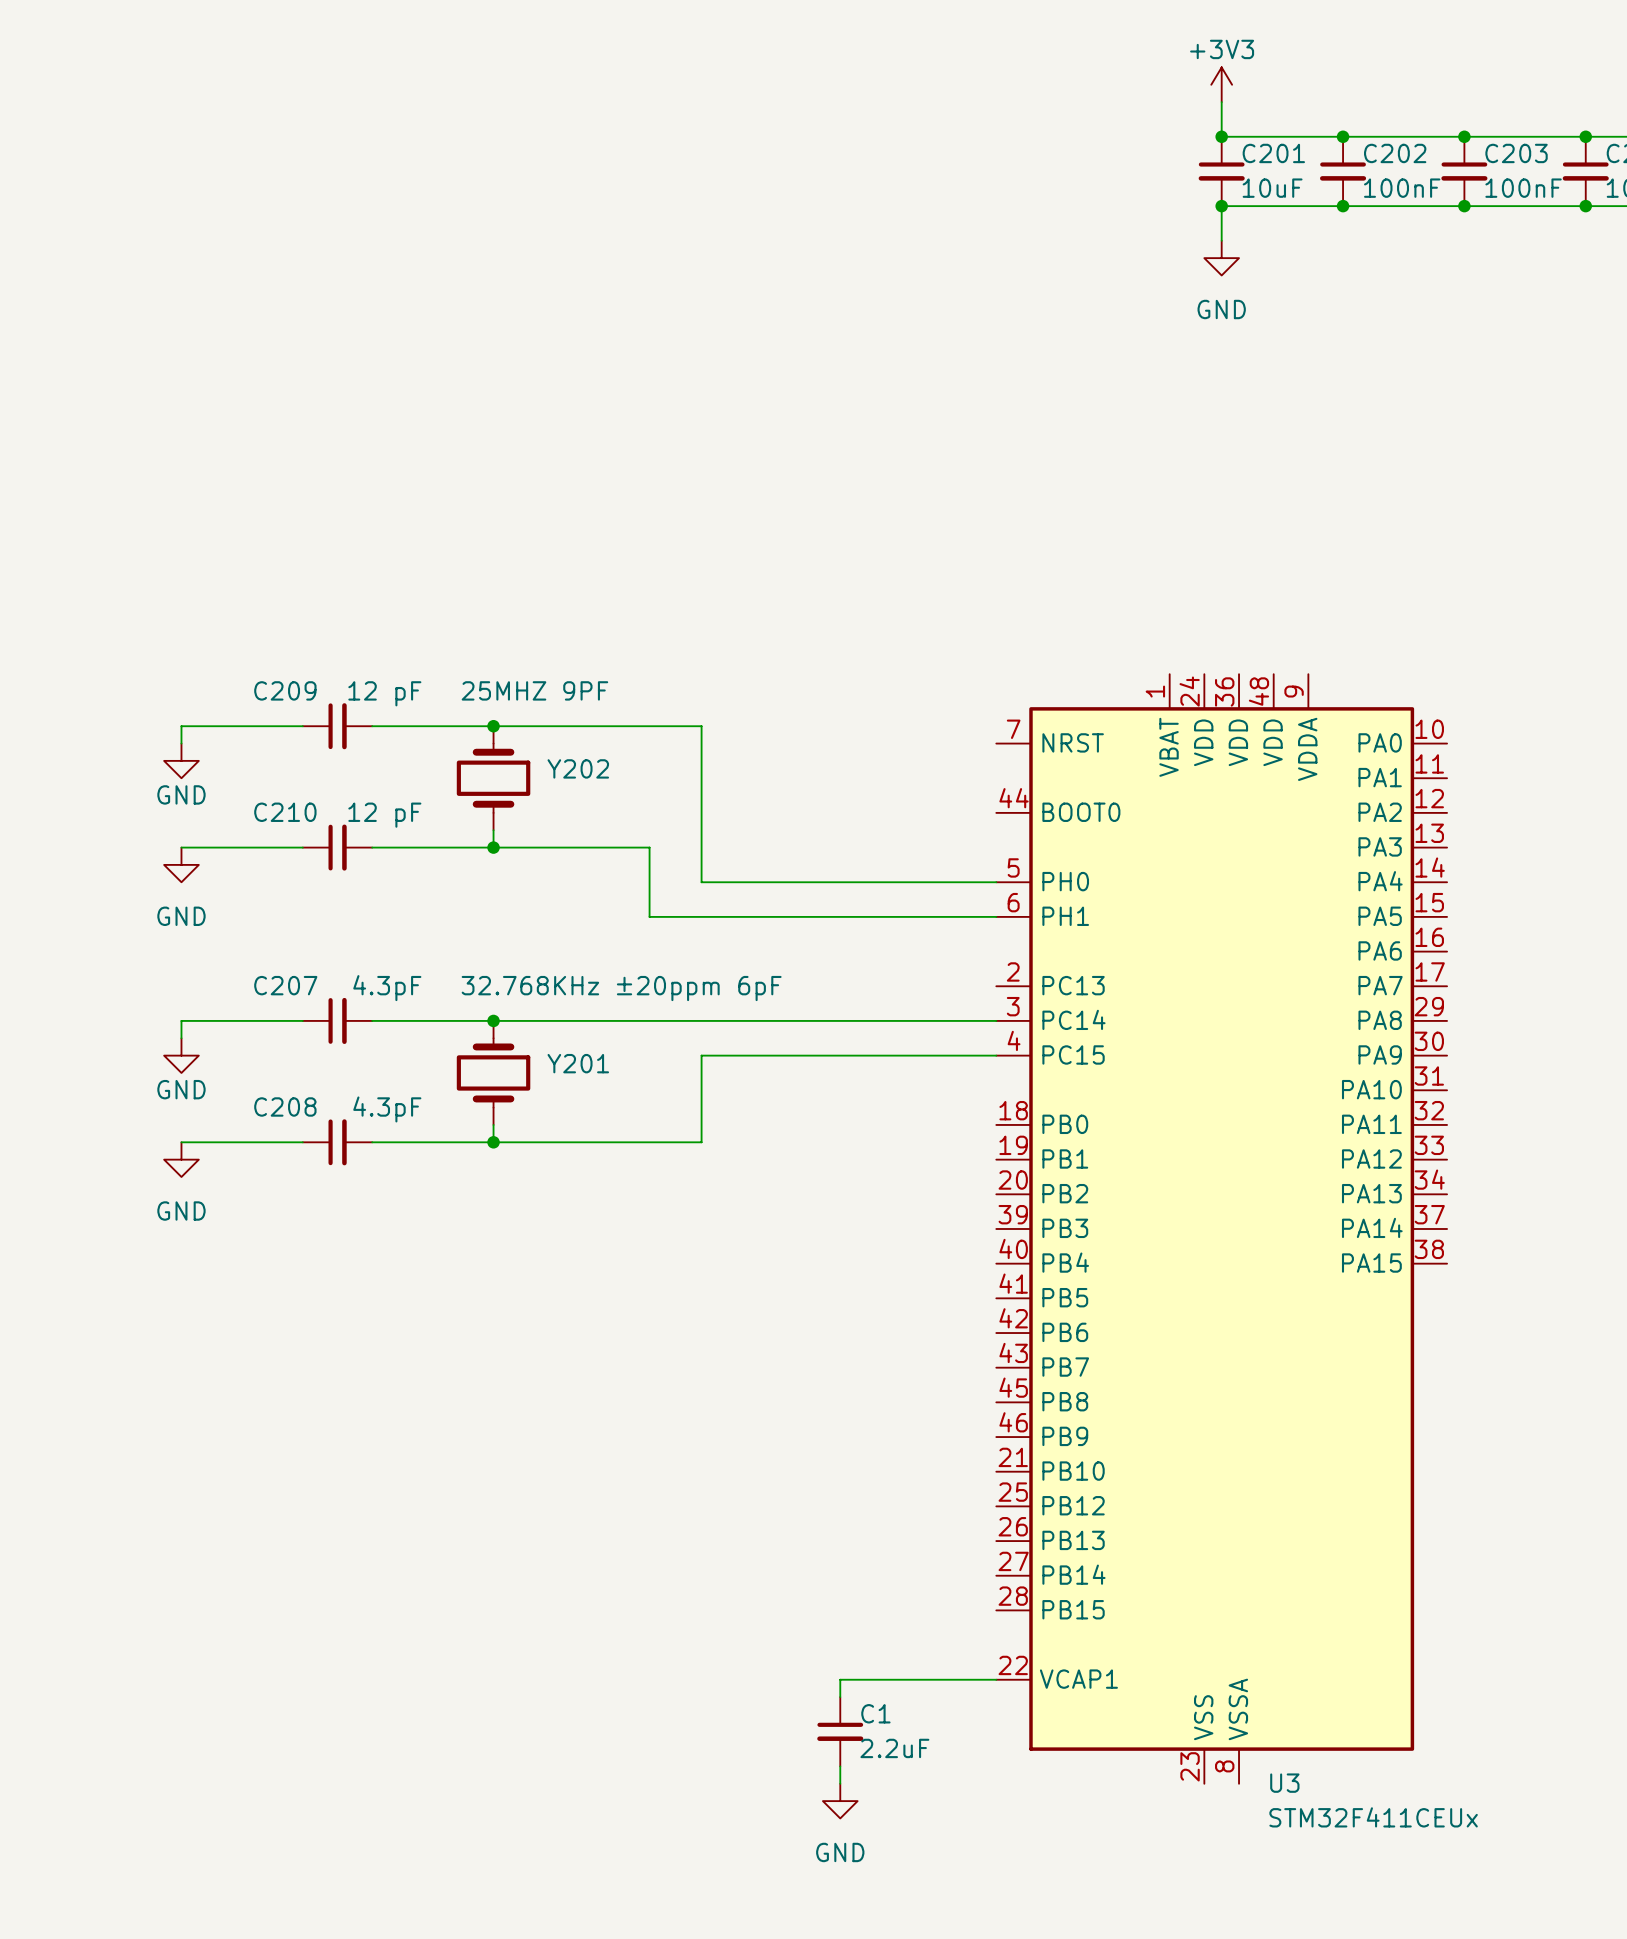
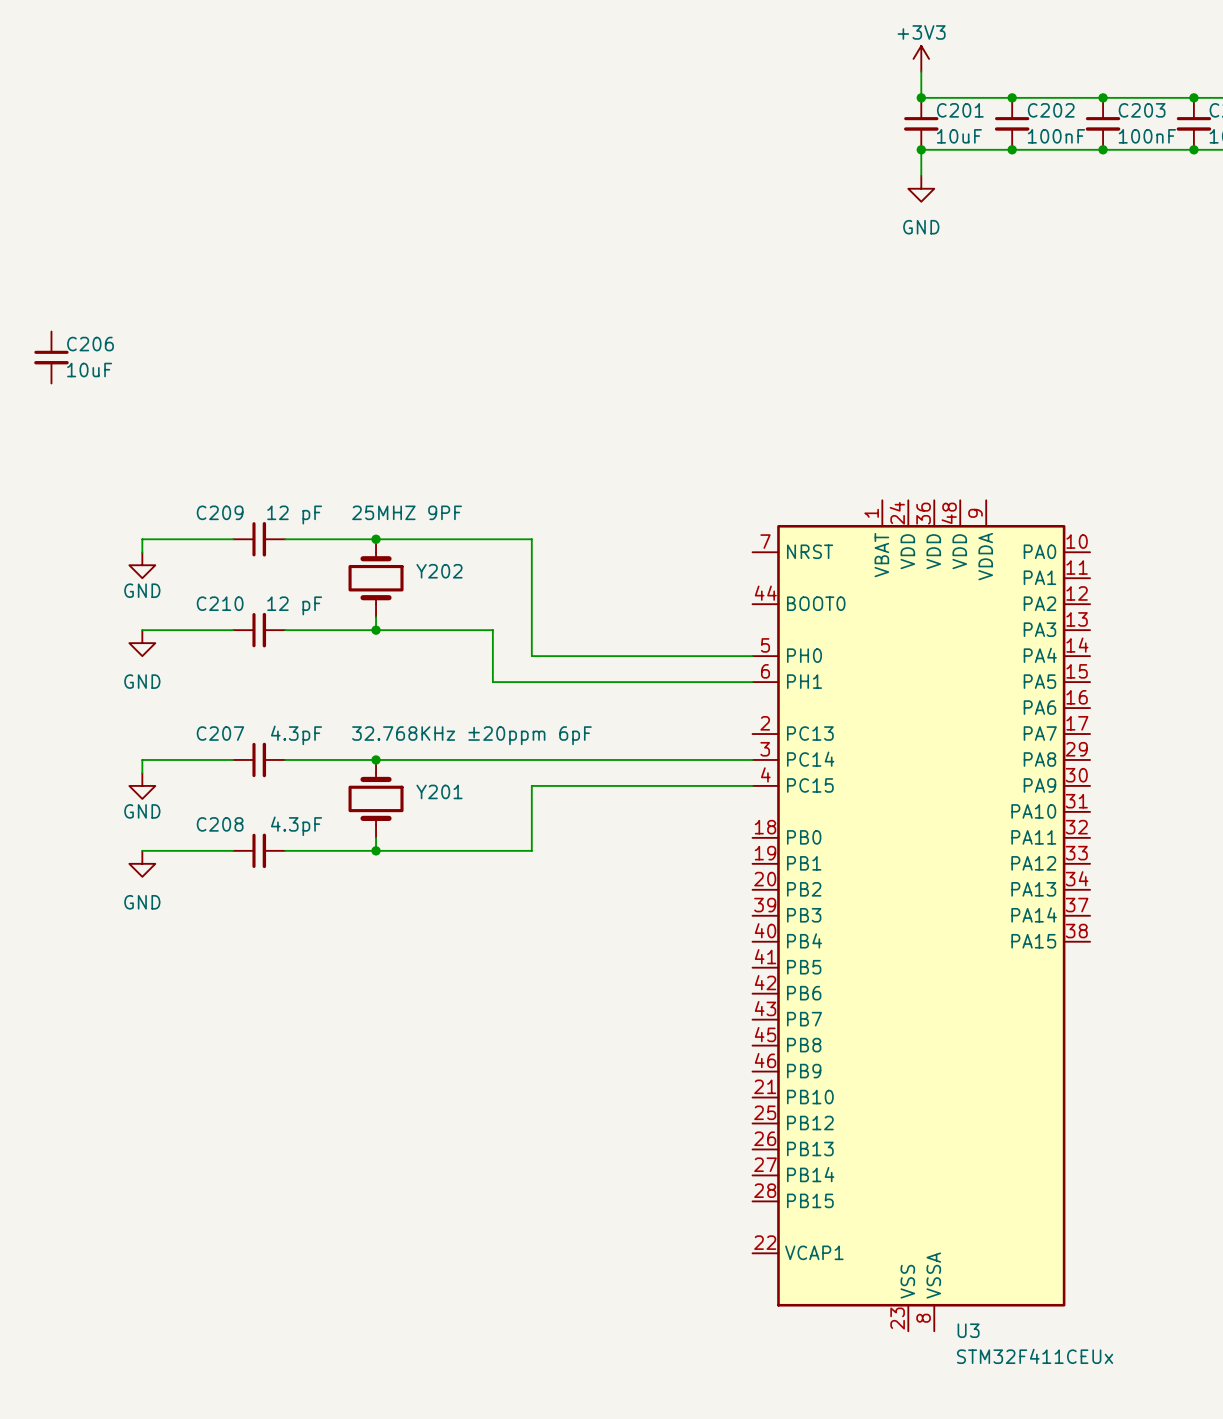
C206: none -> 10uF (51, 357)
wire: (996, 1679) (840, 1679) (840, 1697) -> none
C1: 2.2uF (840, 1731) -> none
wire: (840, 1766) (840, 1783) -> none
power symbol: GND (840, 1801) -> none

